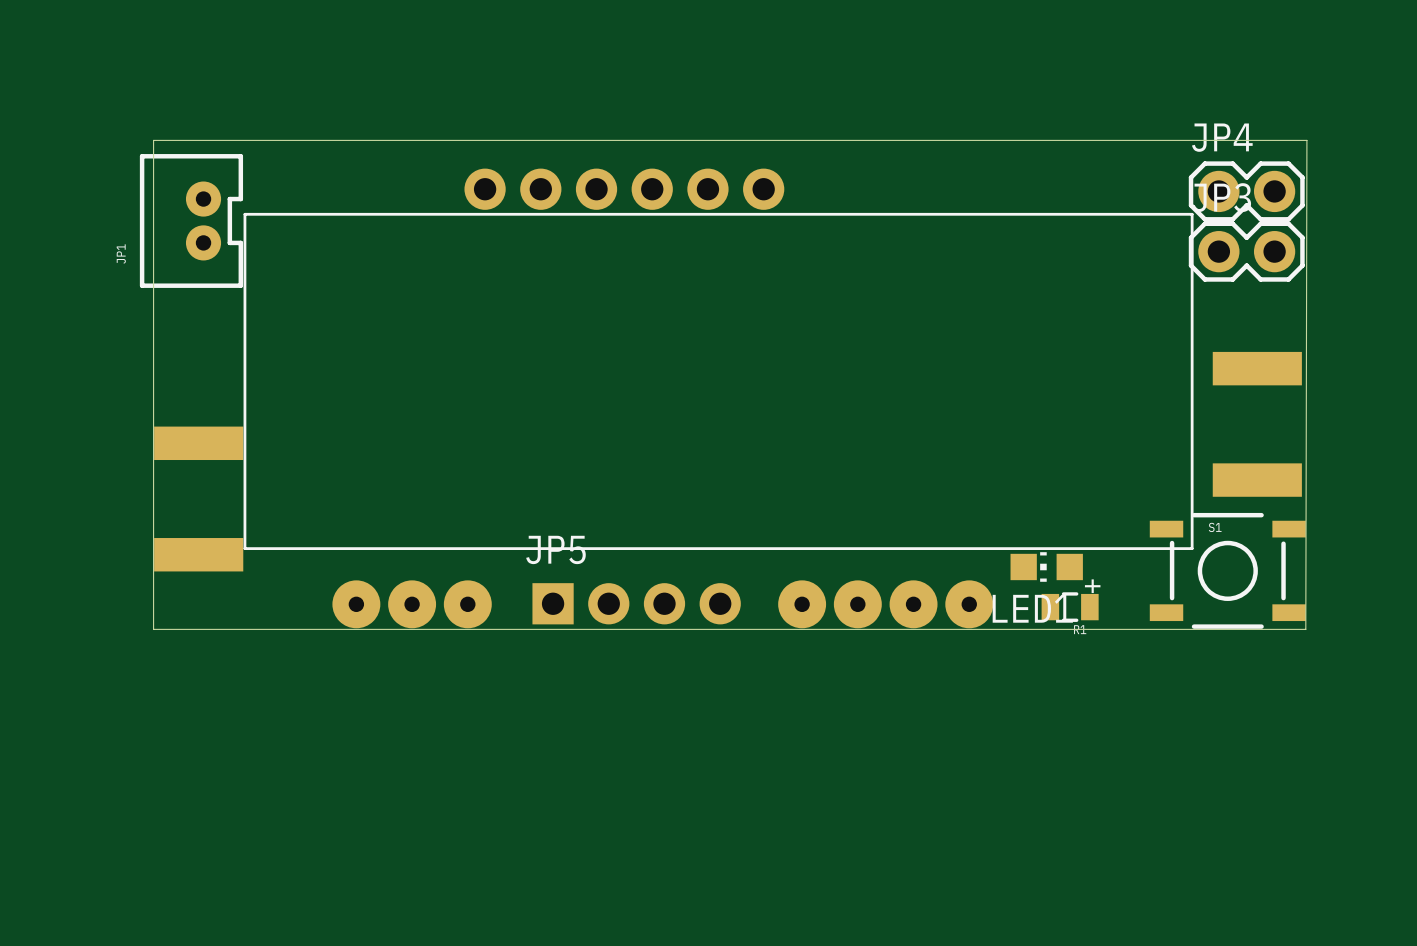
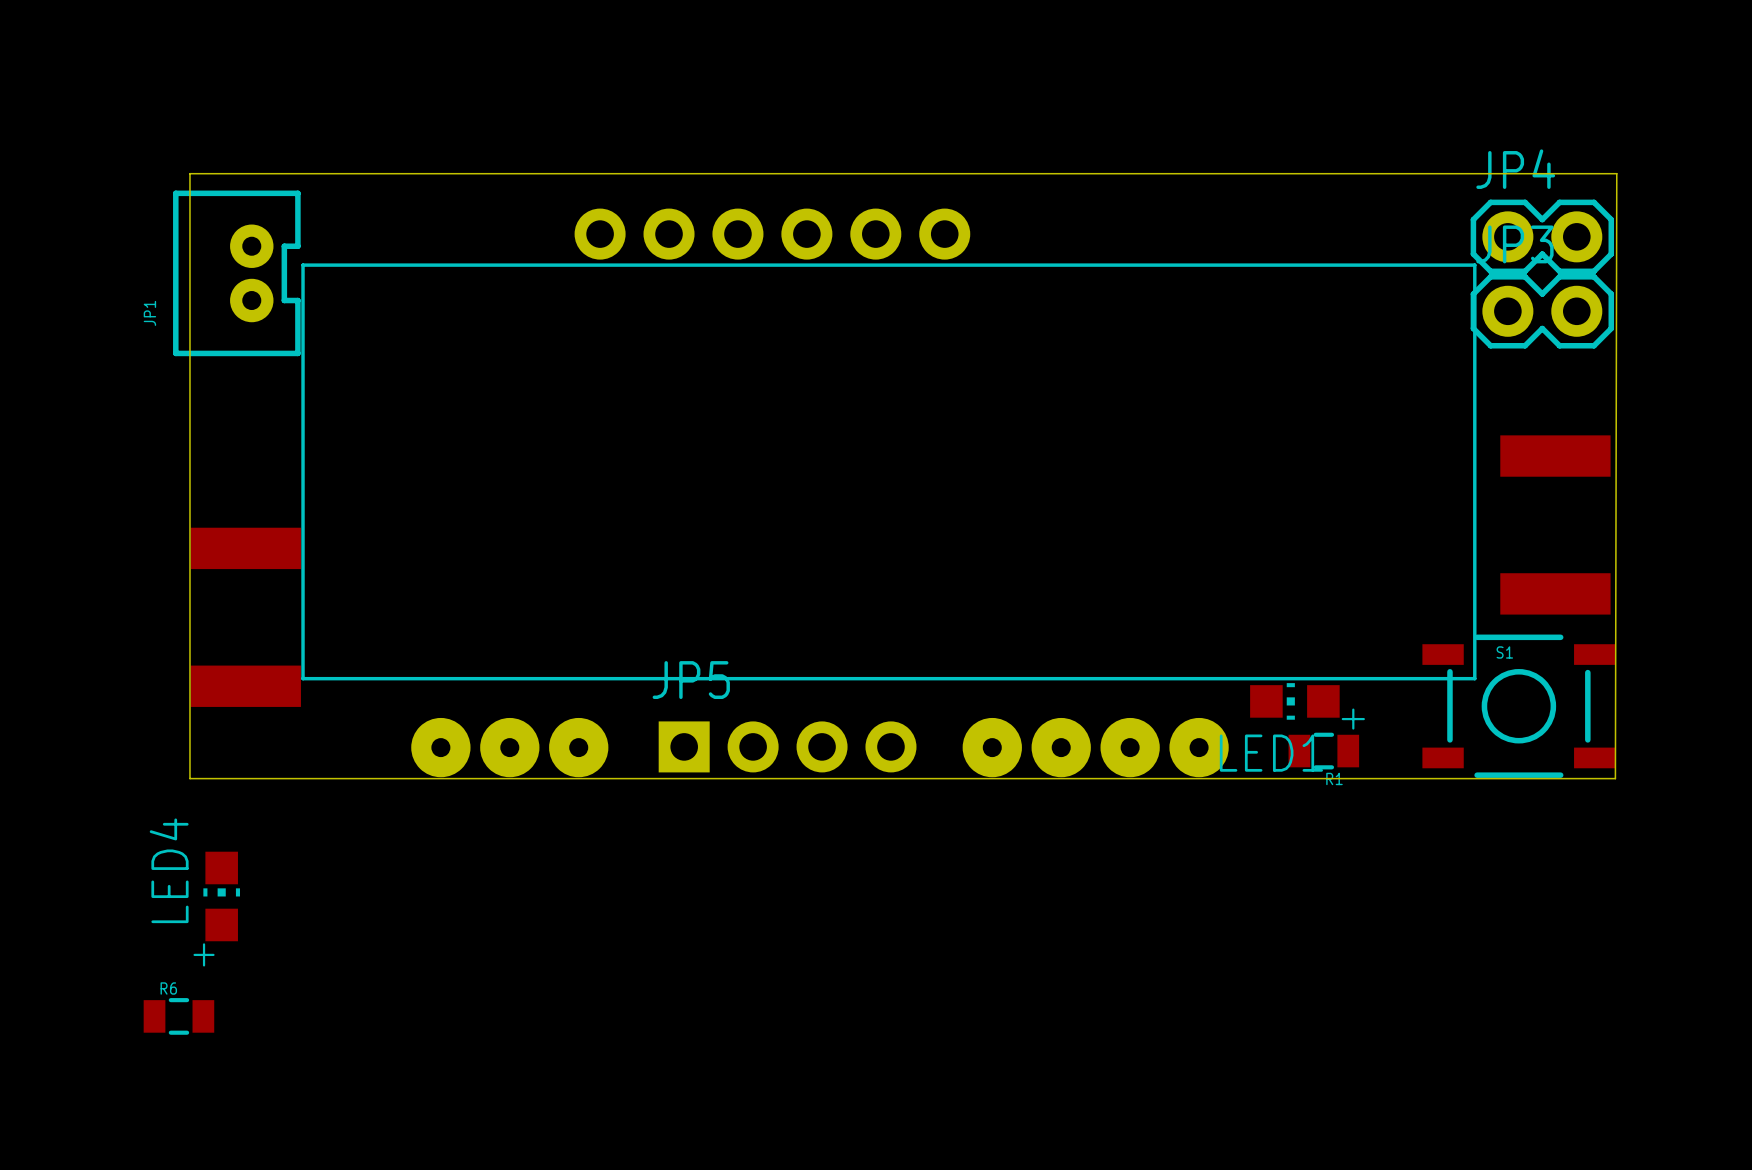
LED4: none -> (221, 896)
R6: none -> (178, 1016)

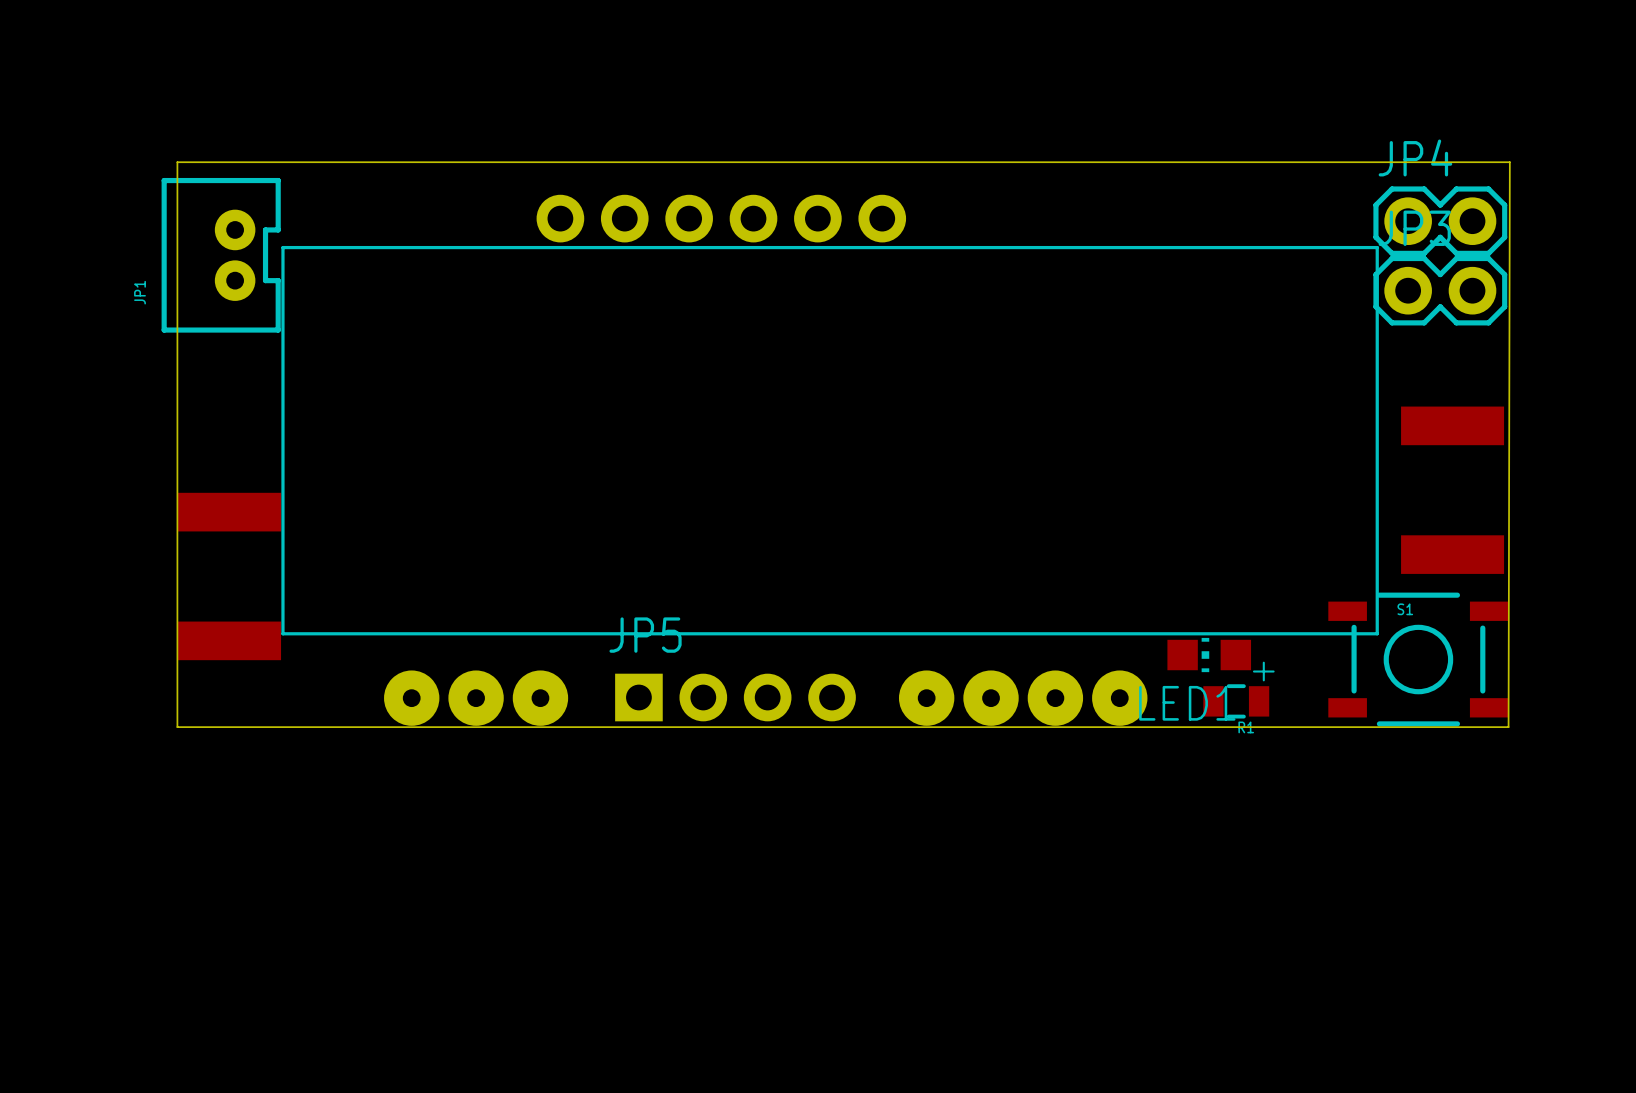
LED4: (221, 896) -> none
R6: (178, 1016) -> none

